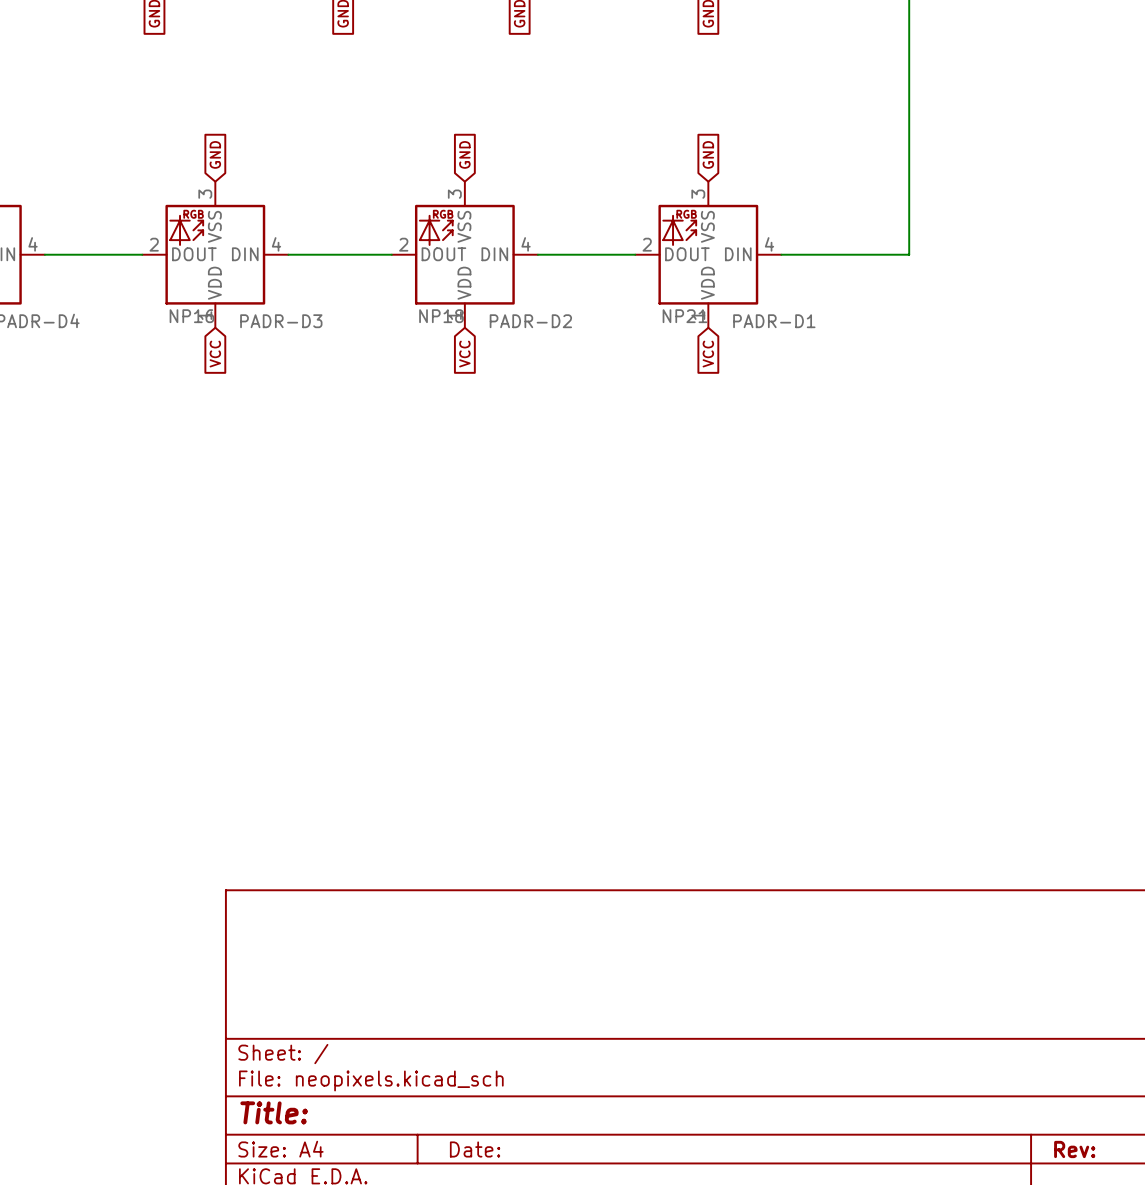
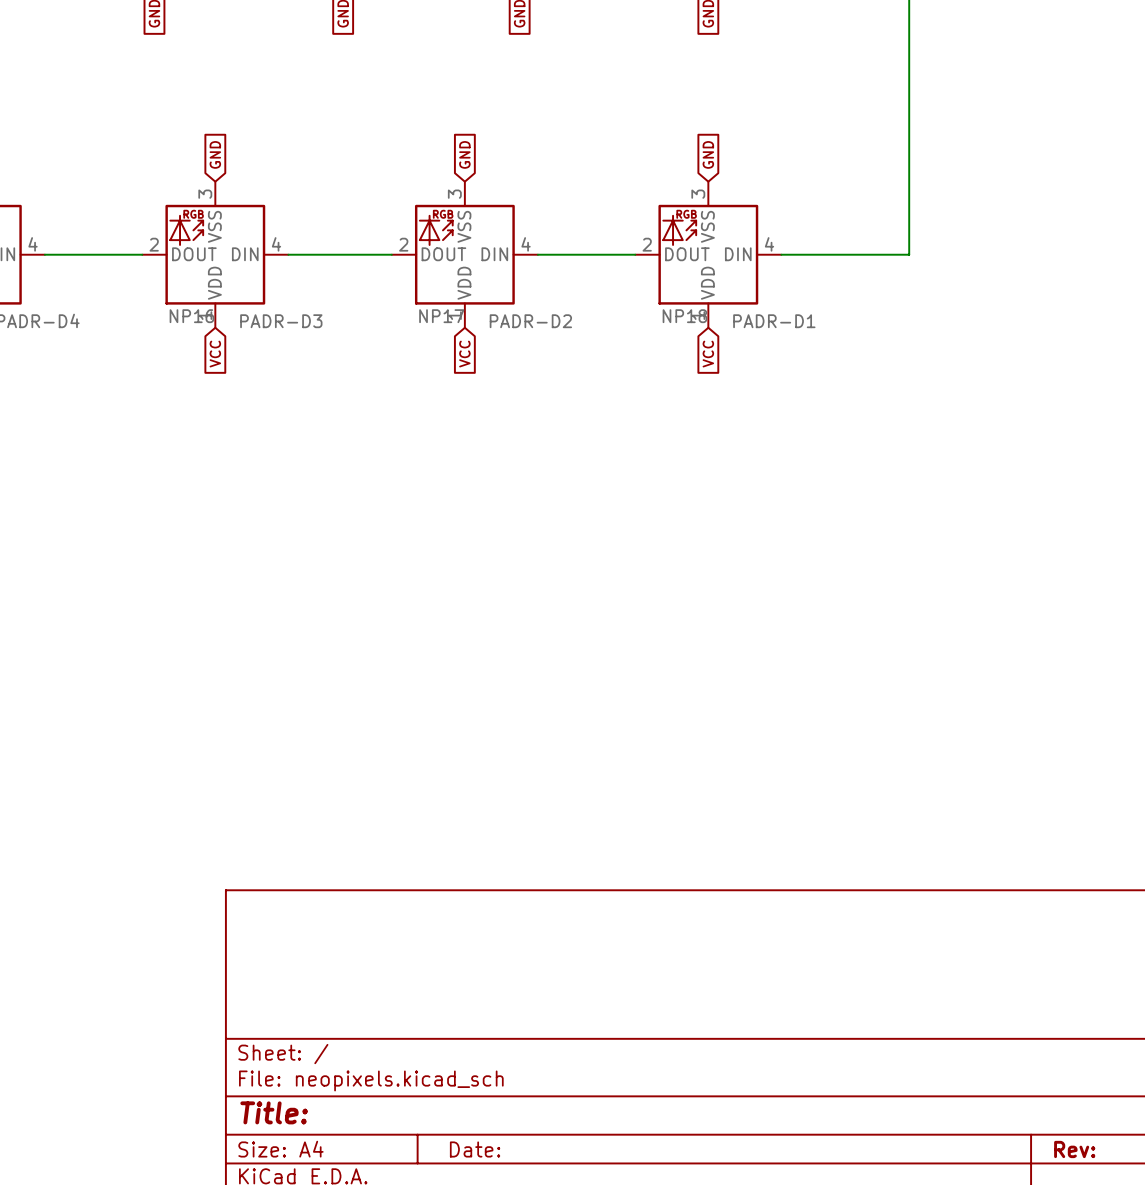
NP18 name: NP18 (441, 316) -> NP17 (441, 316)
NP21 name: NP21 (684, 316) -> NP18 (684, 316)

